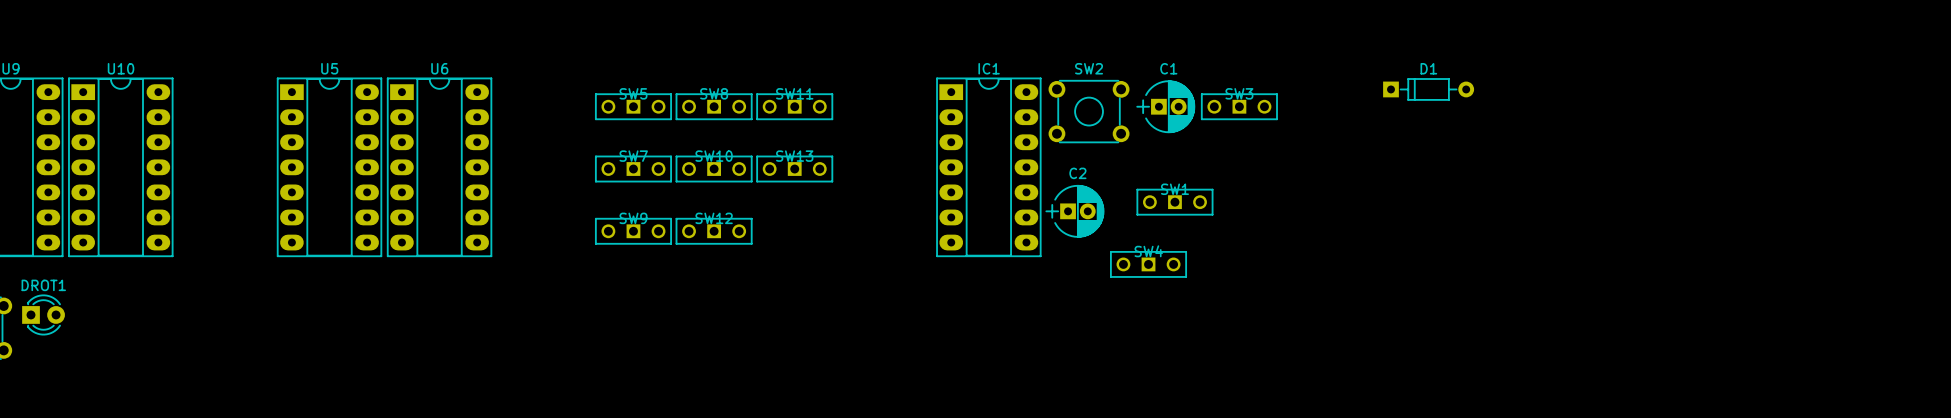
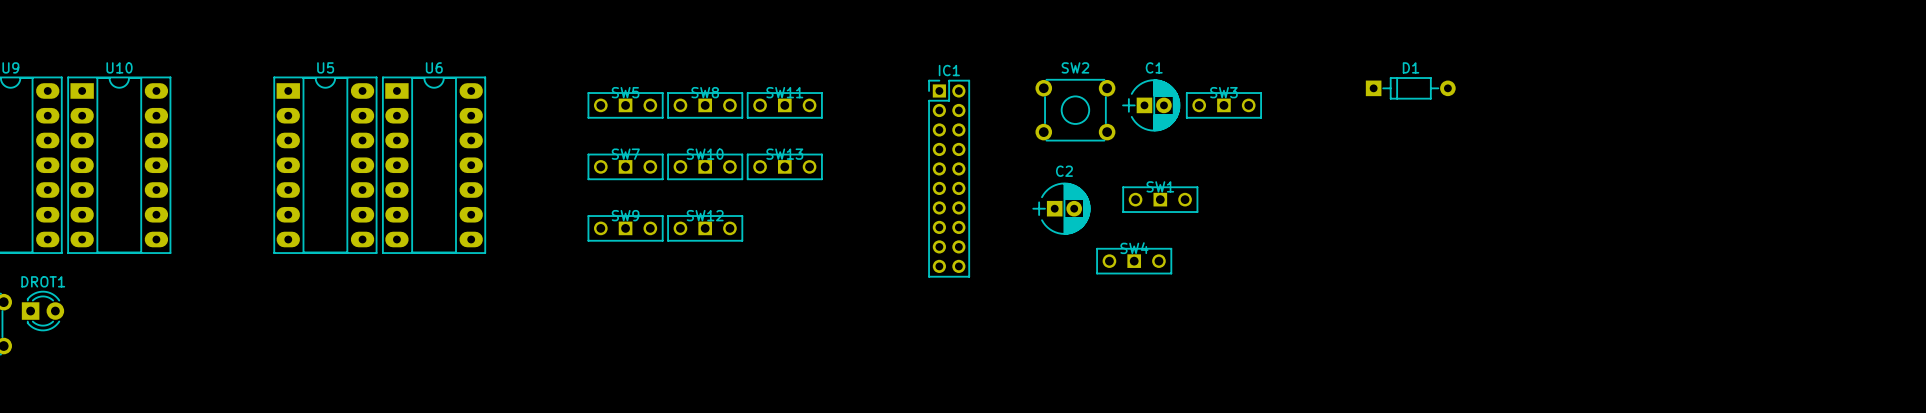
IC1 footprint: [936, 77, 1042, 257] -> [928, 80, 970, 278]

